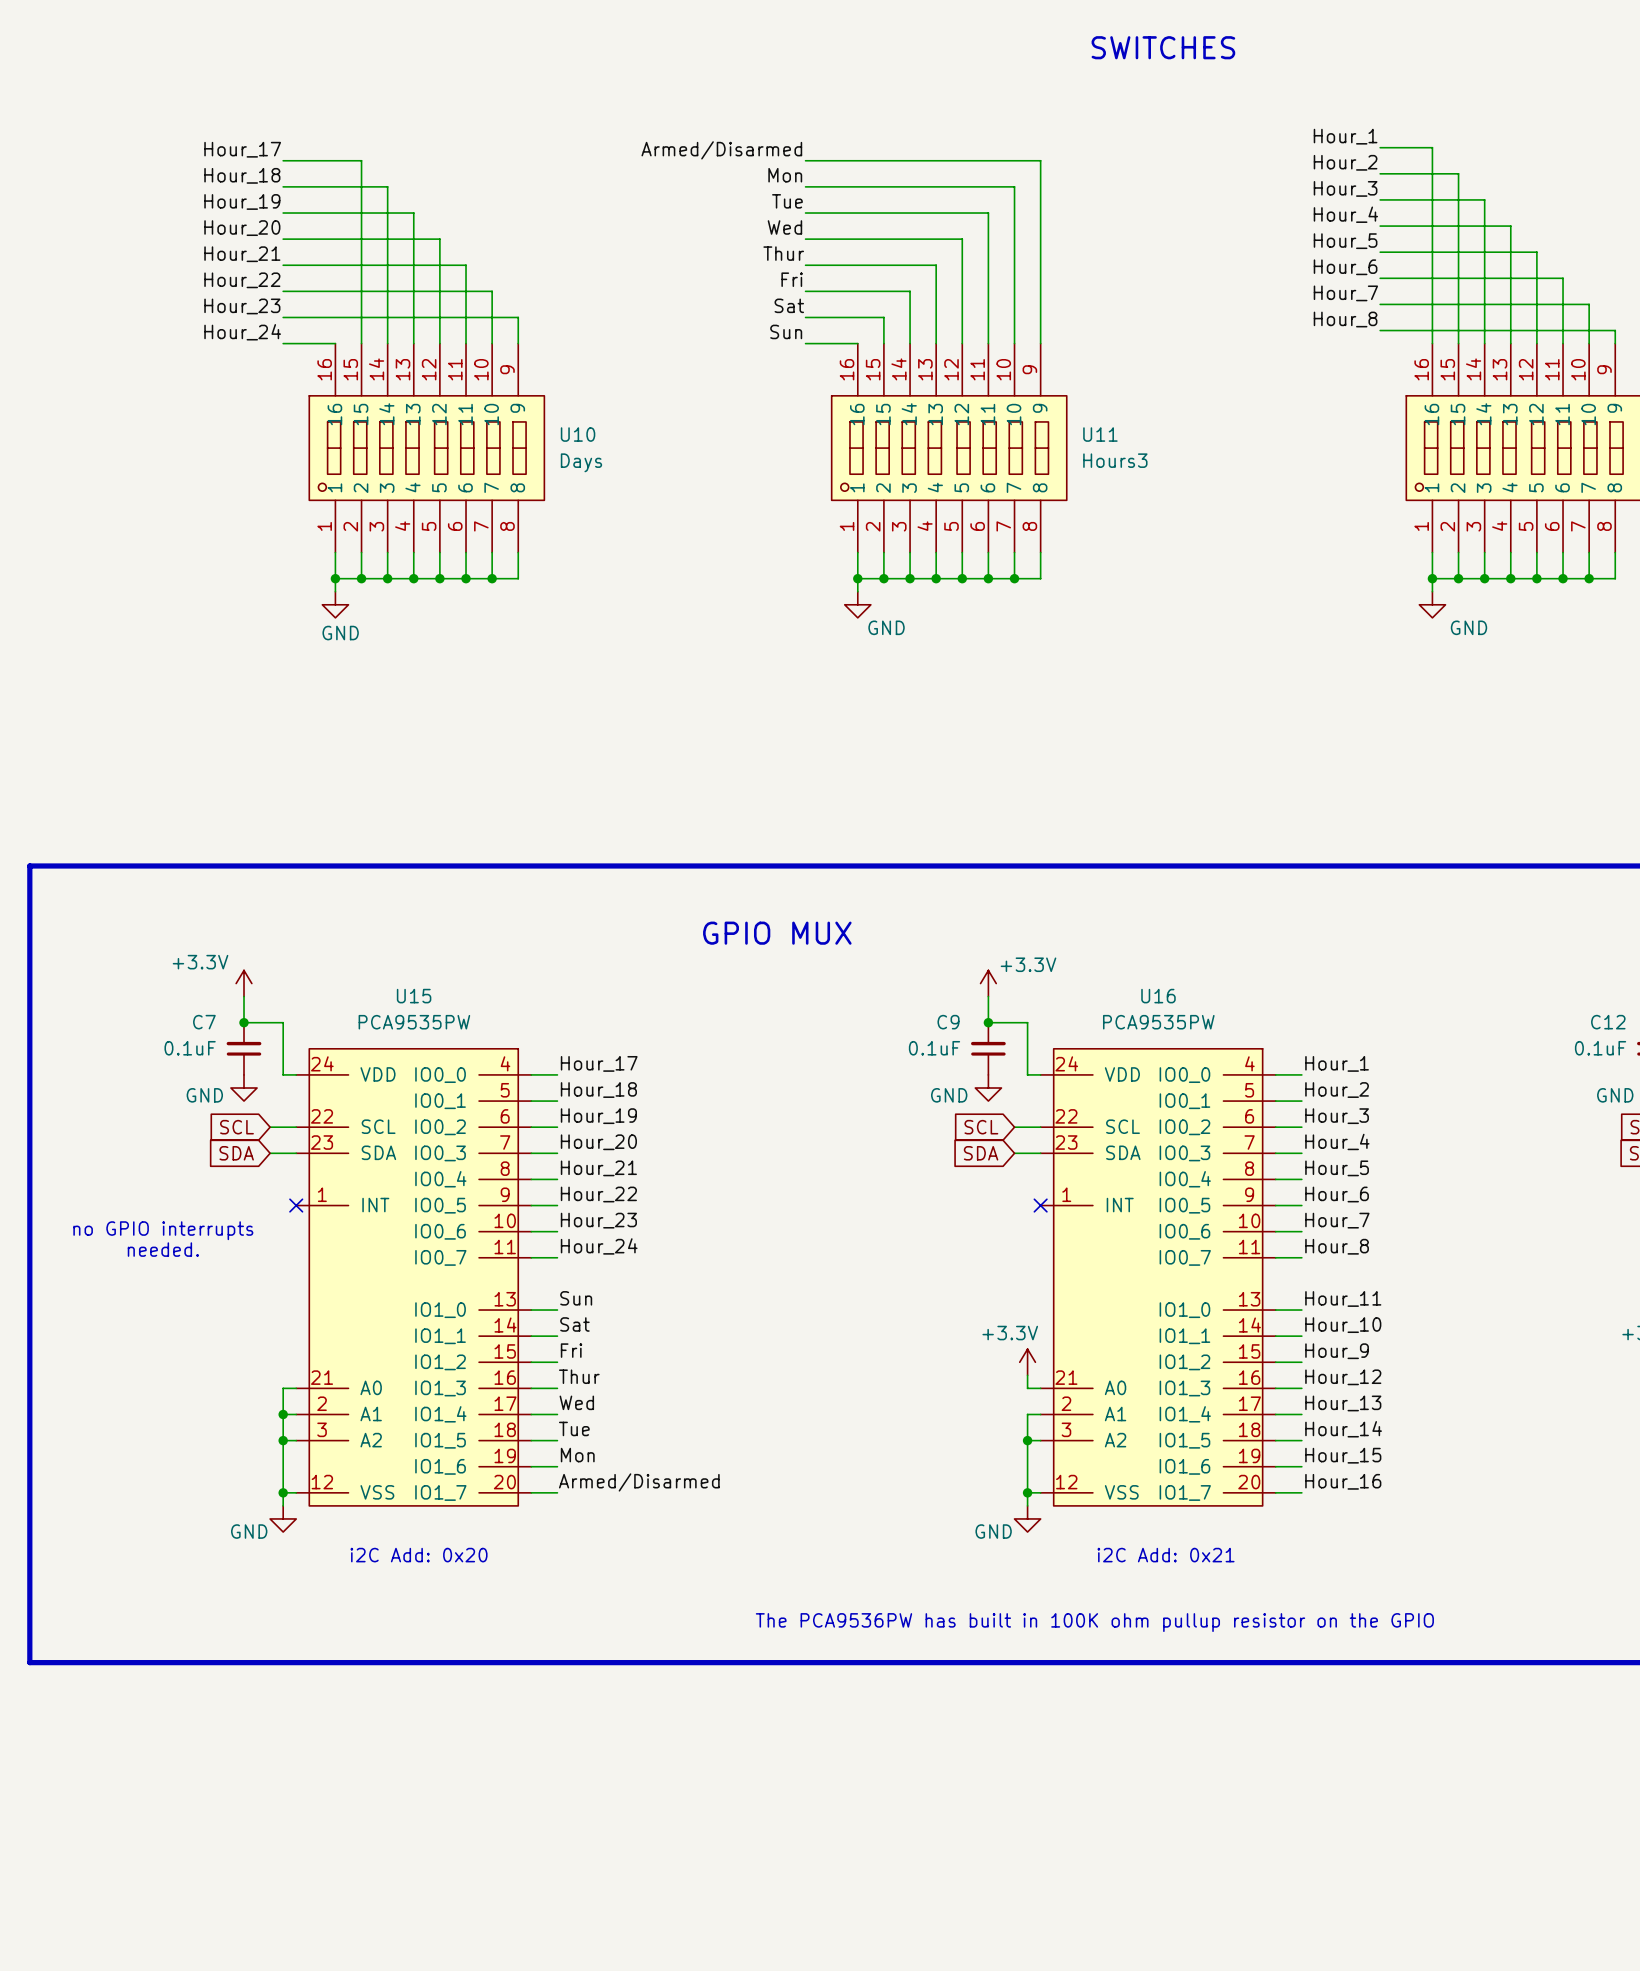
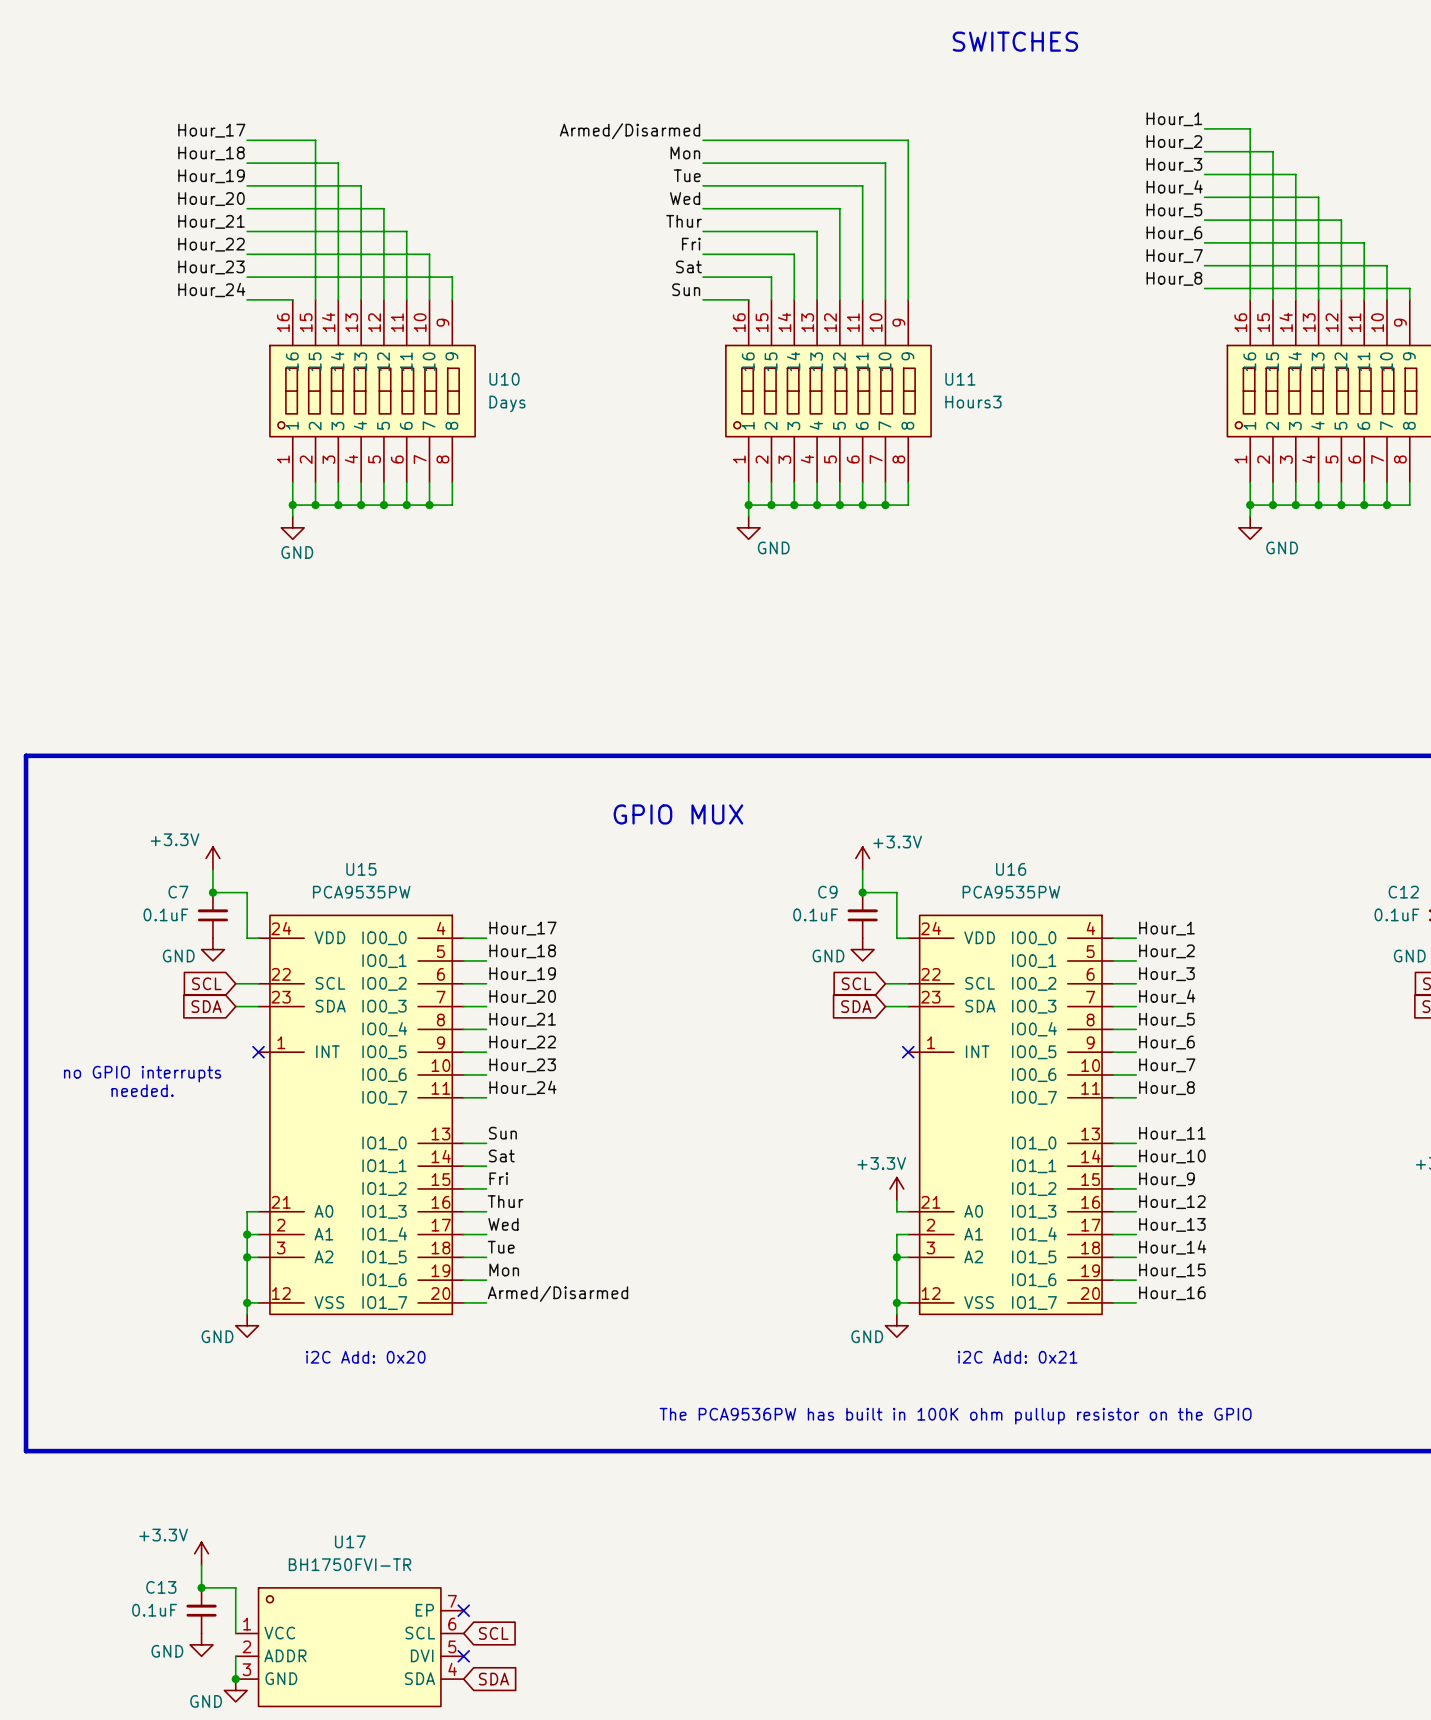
power symbol: none -> +3.3V (201, 1553)
wire: none -> (201, 1565) (201, 1587) (235, 1587) (235, 1633)
junction: none -> (201, 1587)
C13: none -> 0.1uF (201, 1610)
no-connect mark: none -> (463, 1610)
global label: none -> SCL (493, 1633)
power symbol: none -> GND (201, 1644)
U17: none -> BH1750FVI-TR (349, 1647)
wire: none -> (235, 1656) (235, 1679)
no-connect mark: none -> (463, 1656)
junction: none -> (235, 1679)
global label: none -> SDA (494, 1679)
power symbol: none -> GND (235, 1690)

